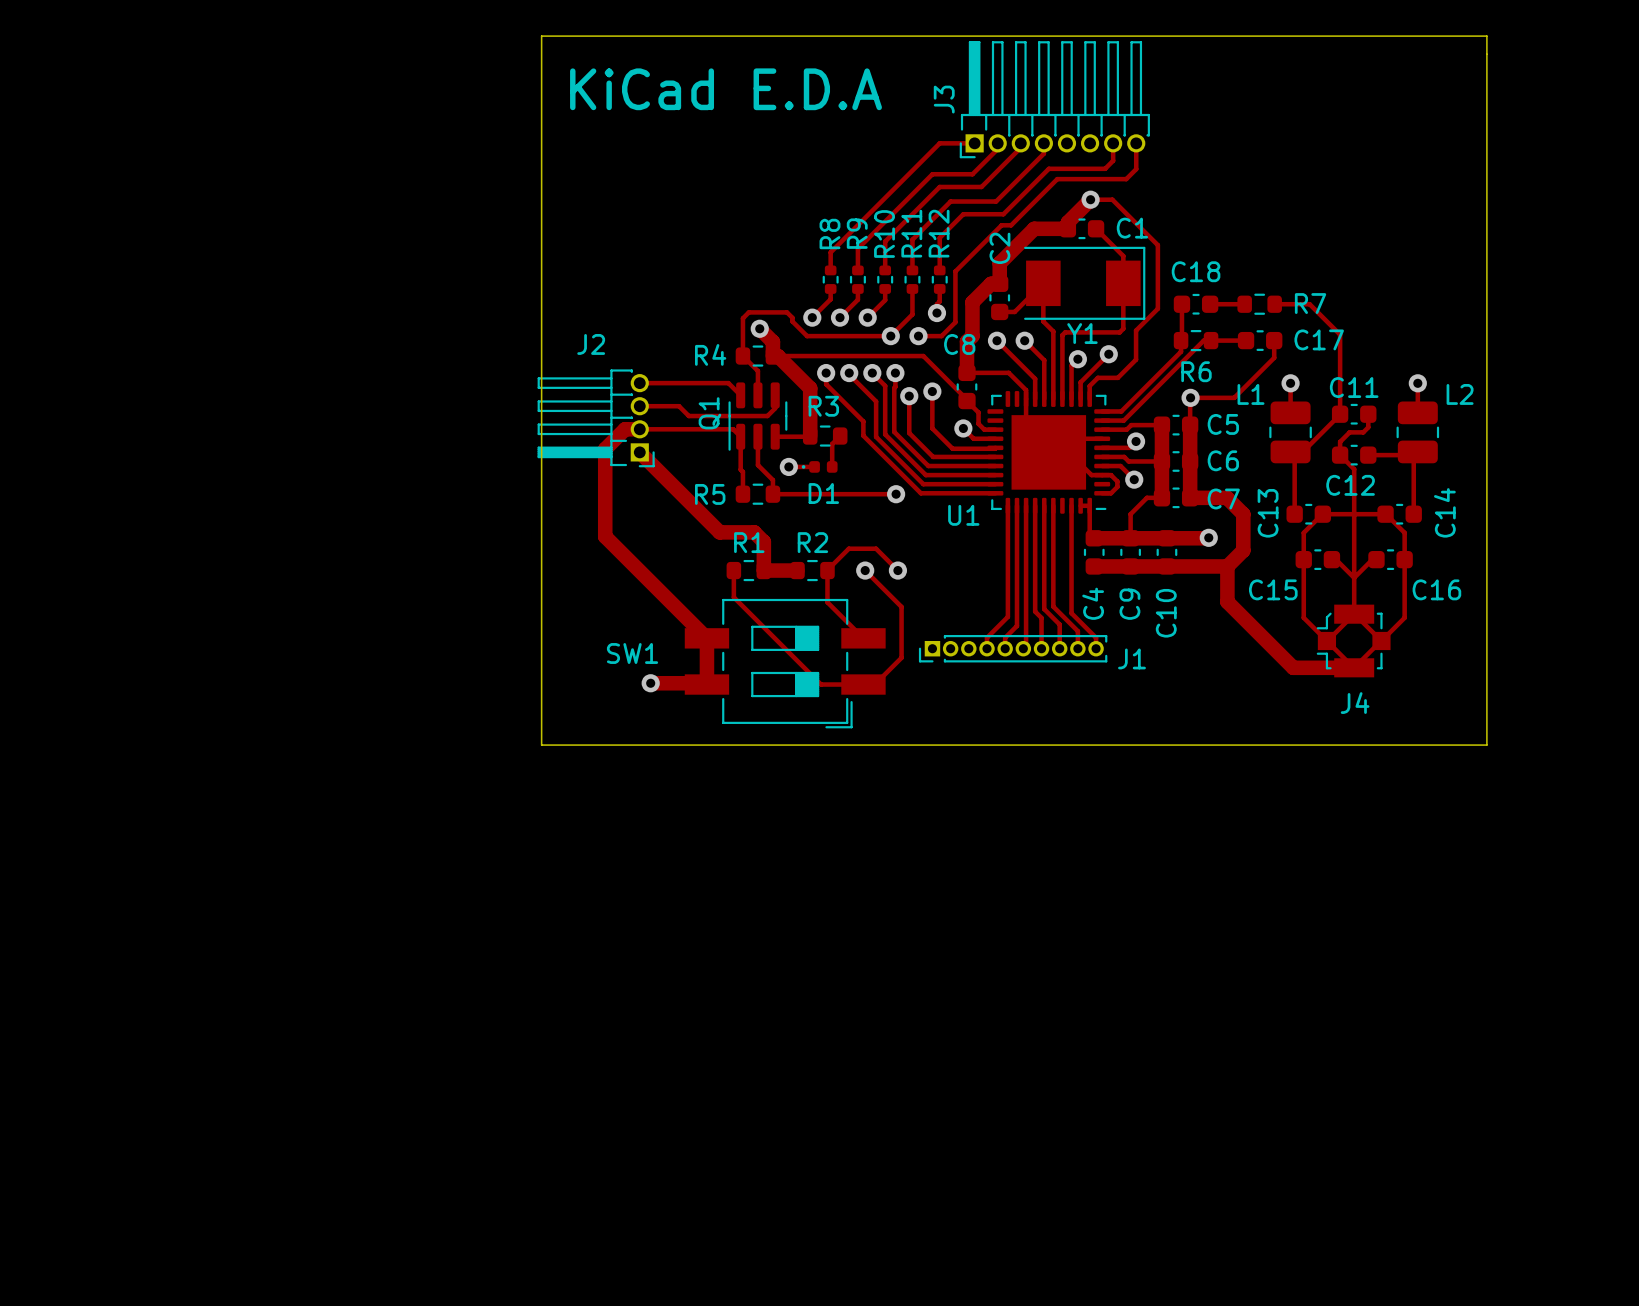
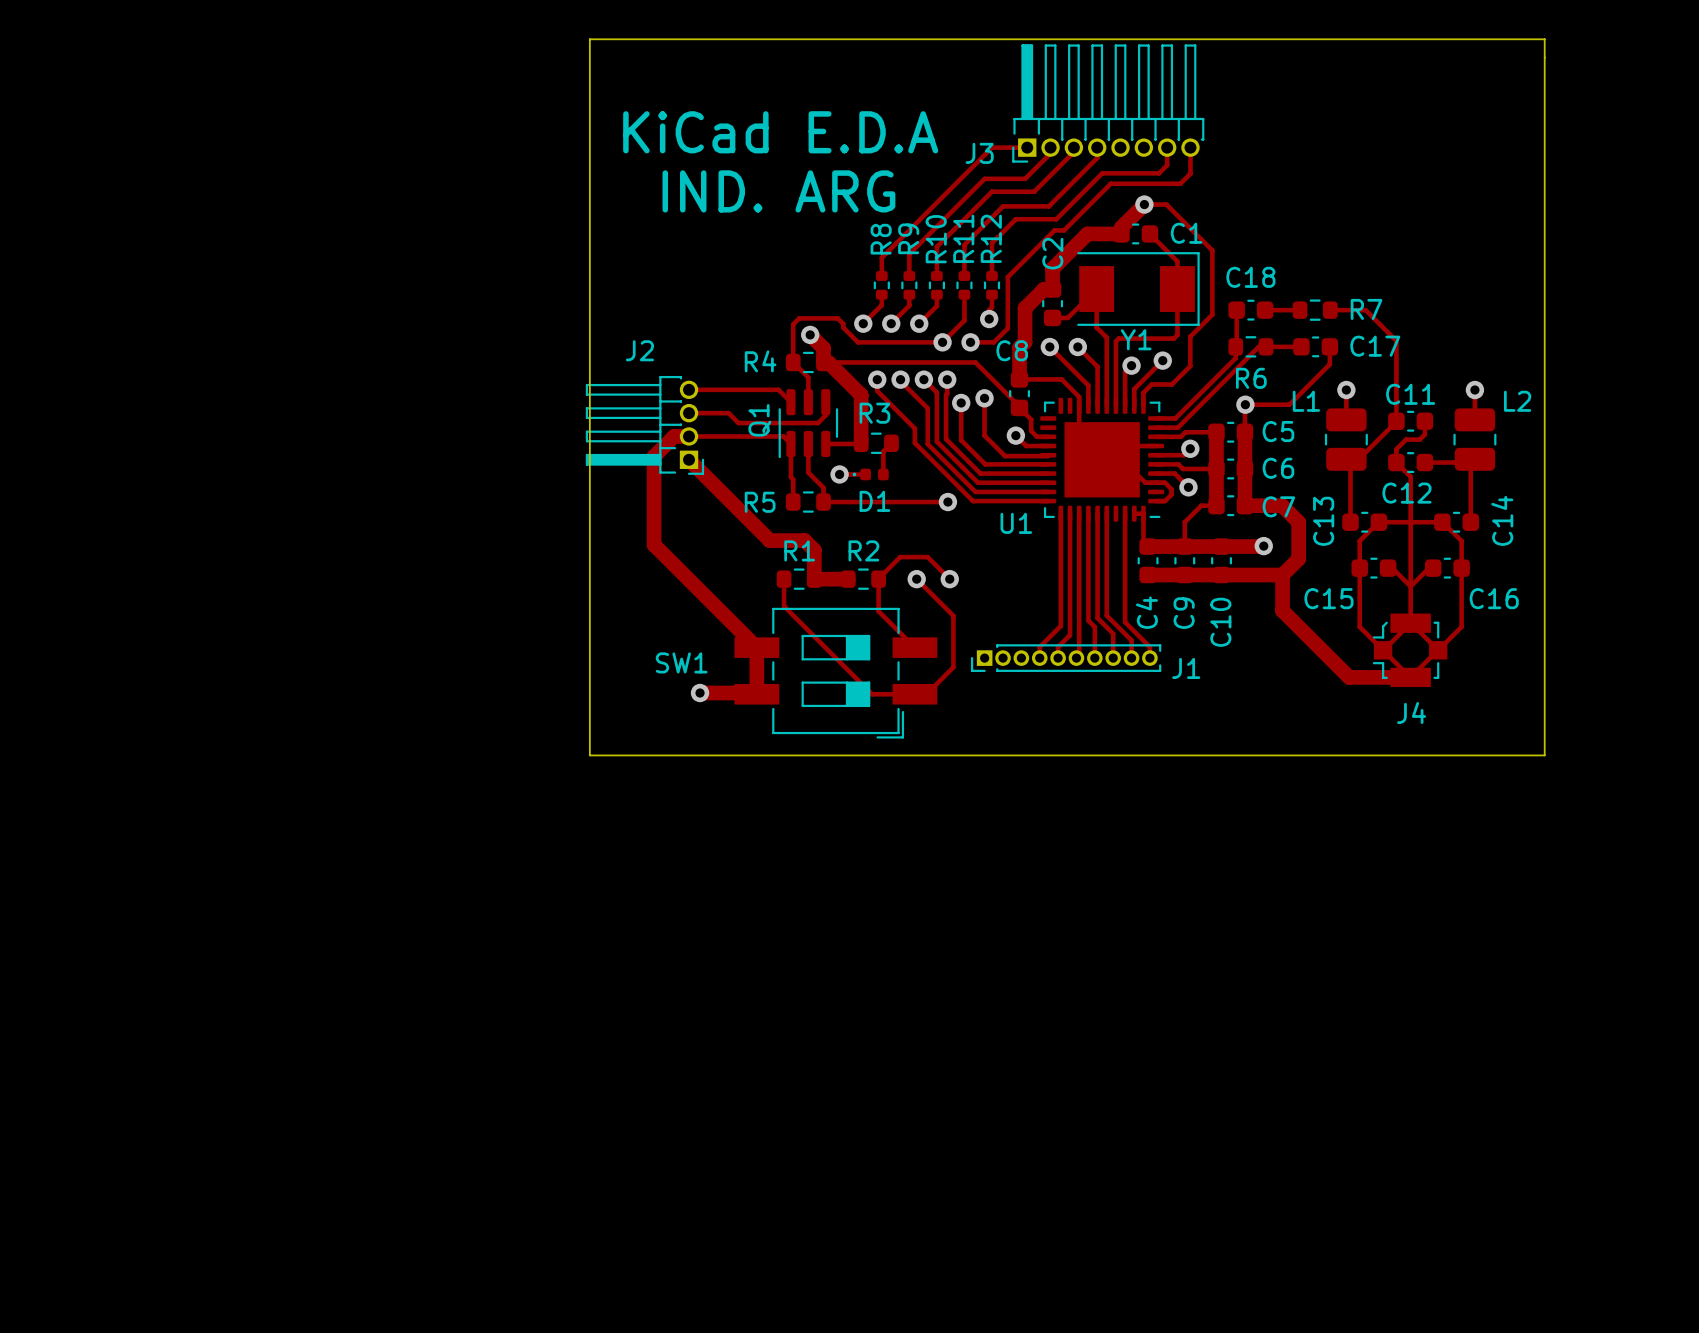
text position: KiCad E.D.A (726, 89) -> KiCad E.D.A (780, 132)
J3 name rotation: 0° (944, 99) -> 90° clockwise (979, 153)
J3 name position: J3 (944, 99) -> J3 (979, 153)
text: none -> IND. ARG (778, 191)

